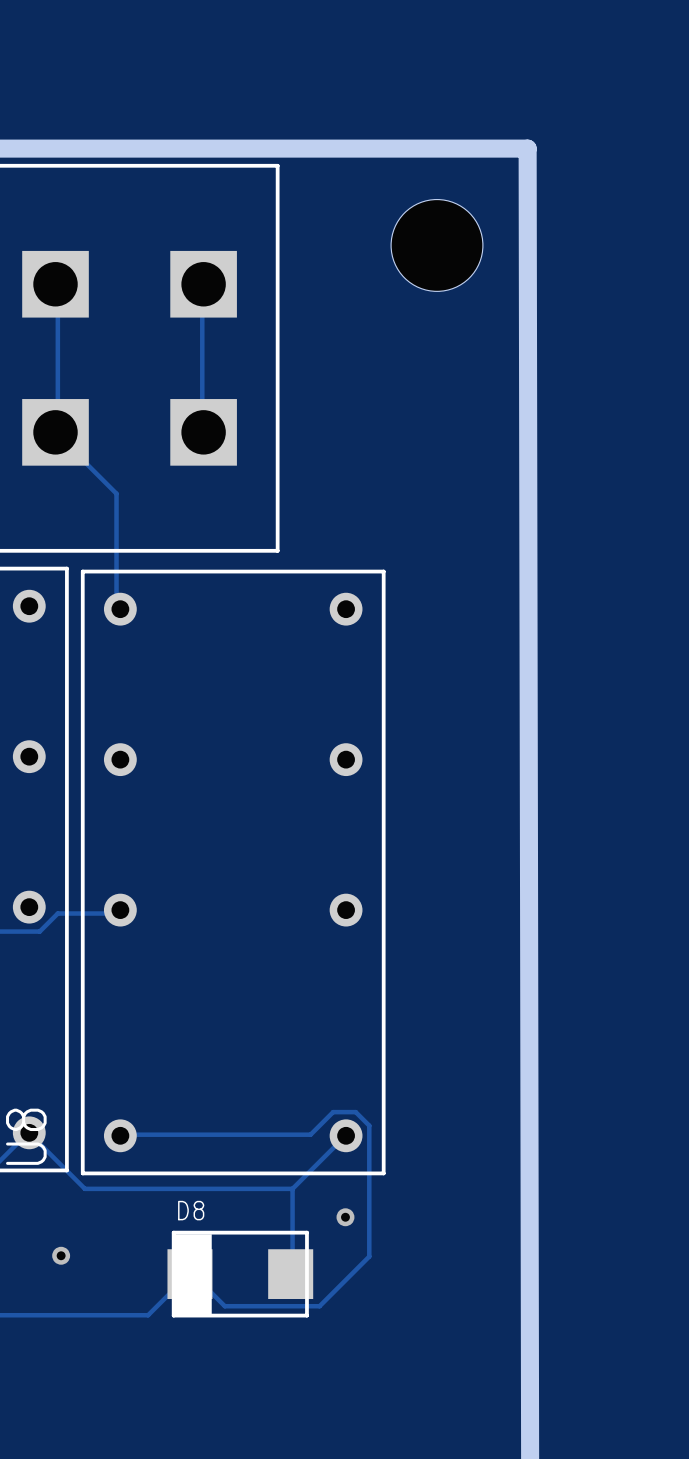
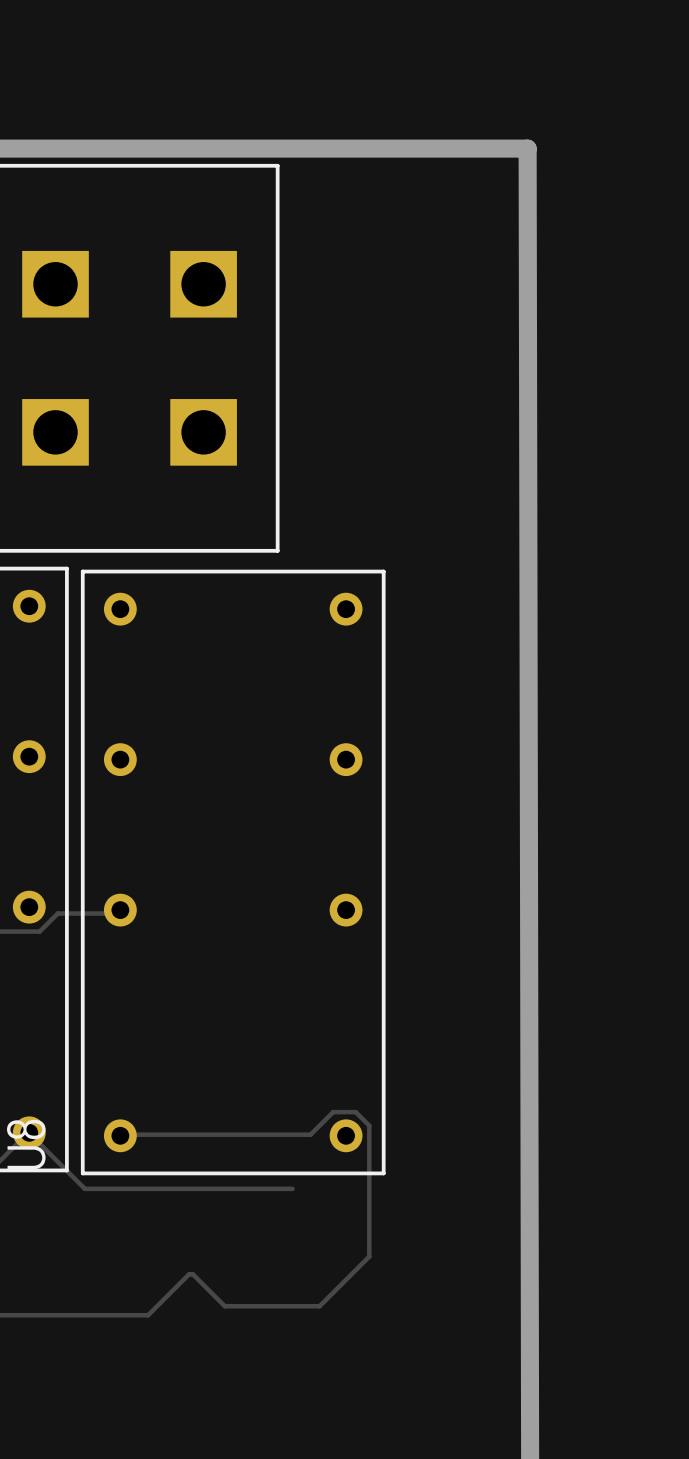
hole: (437, 245) -> none
track: (55, 284) (57, 286) (57, 430) (55, 432) (116, 493) (116, 606) (120, 609) -> none
track: (203, 284) (203, 432) -> none
track: (346, 1135) (292, 1188) (292, 1270) (290, 1274) -> none
via: (345, 1217) -> none
via: (61, 1255) -> none
D8: (240, 1274) -> none

